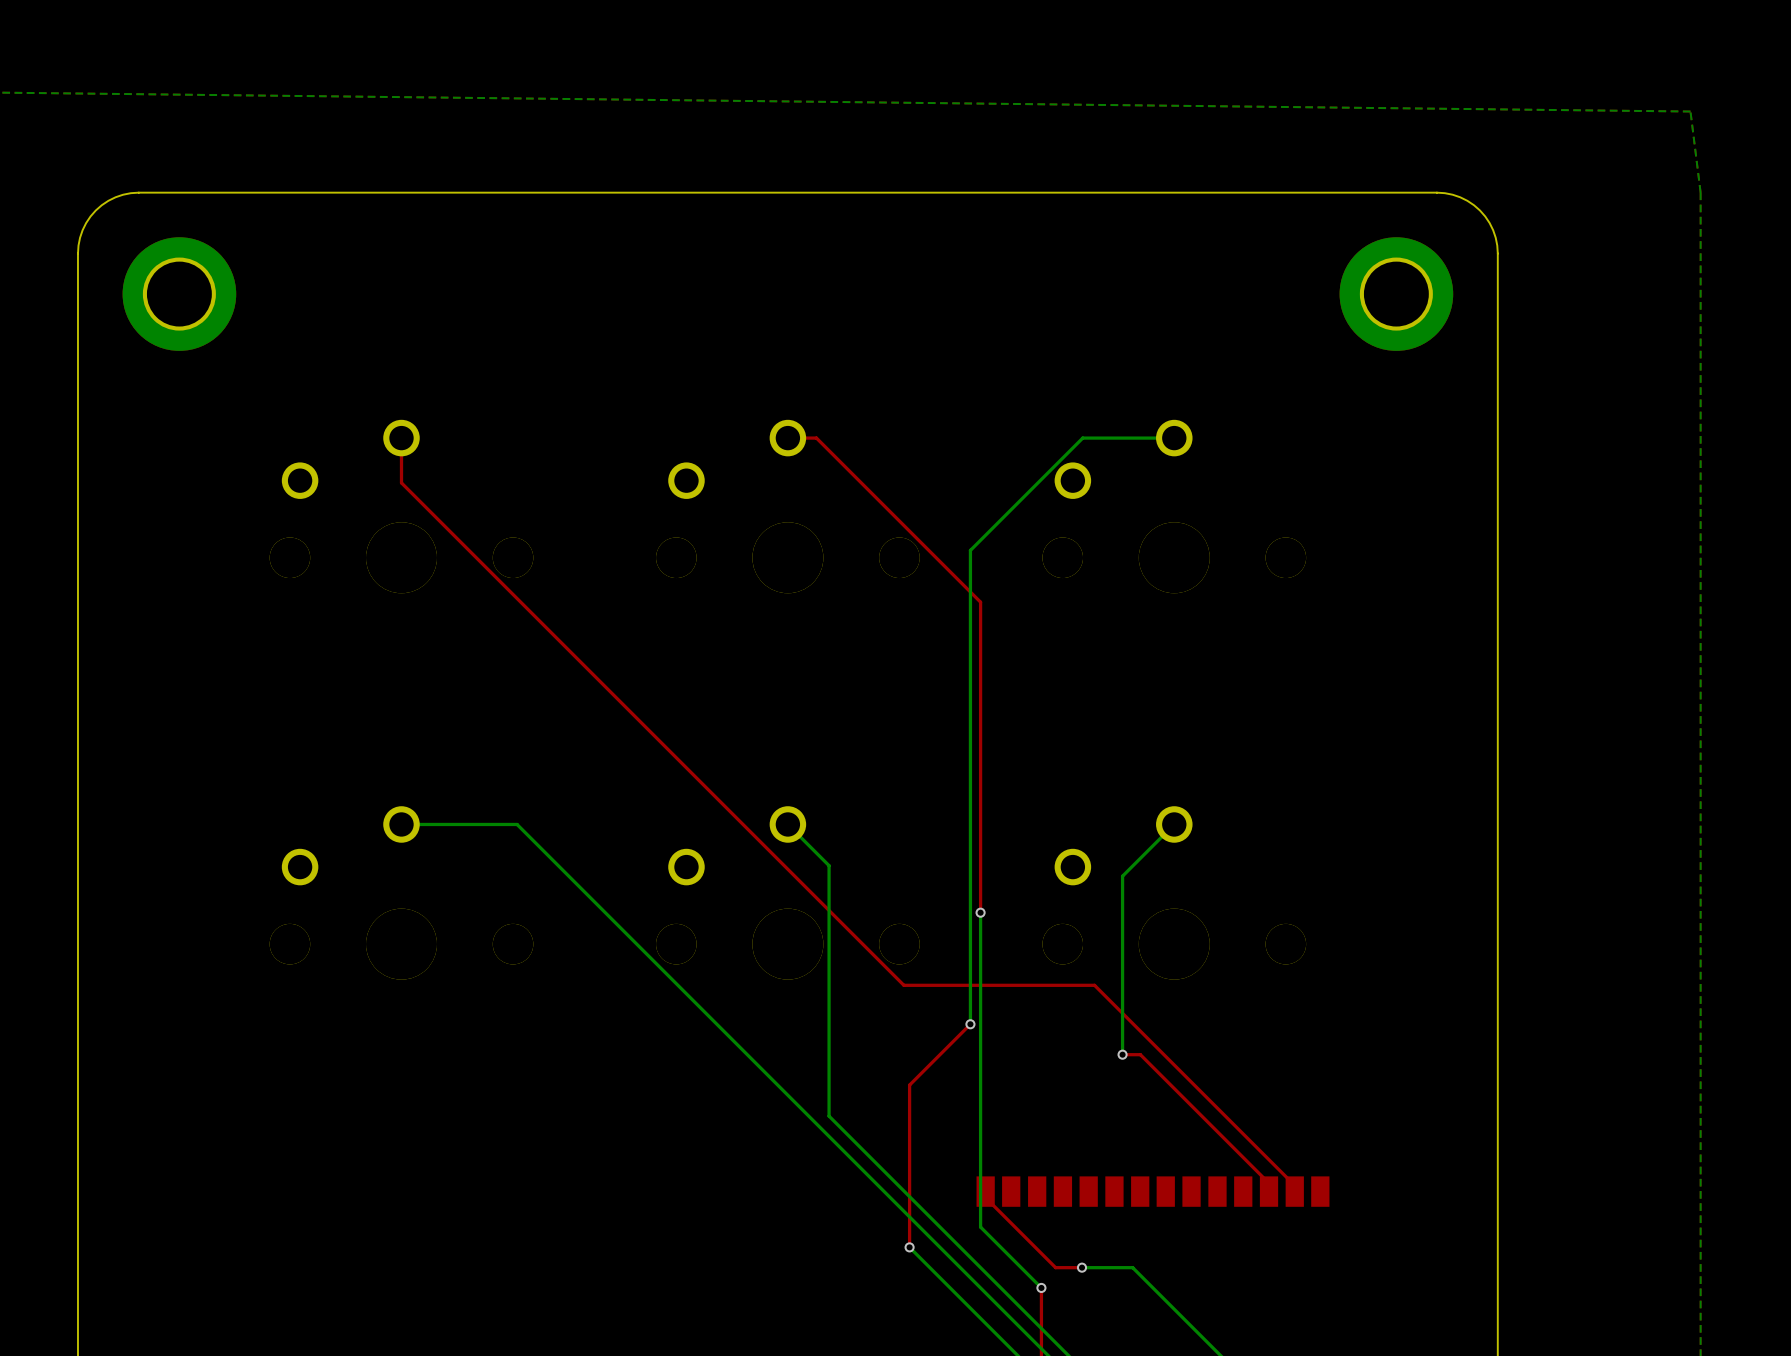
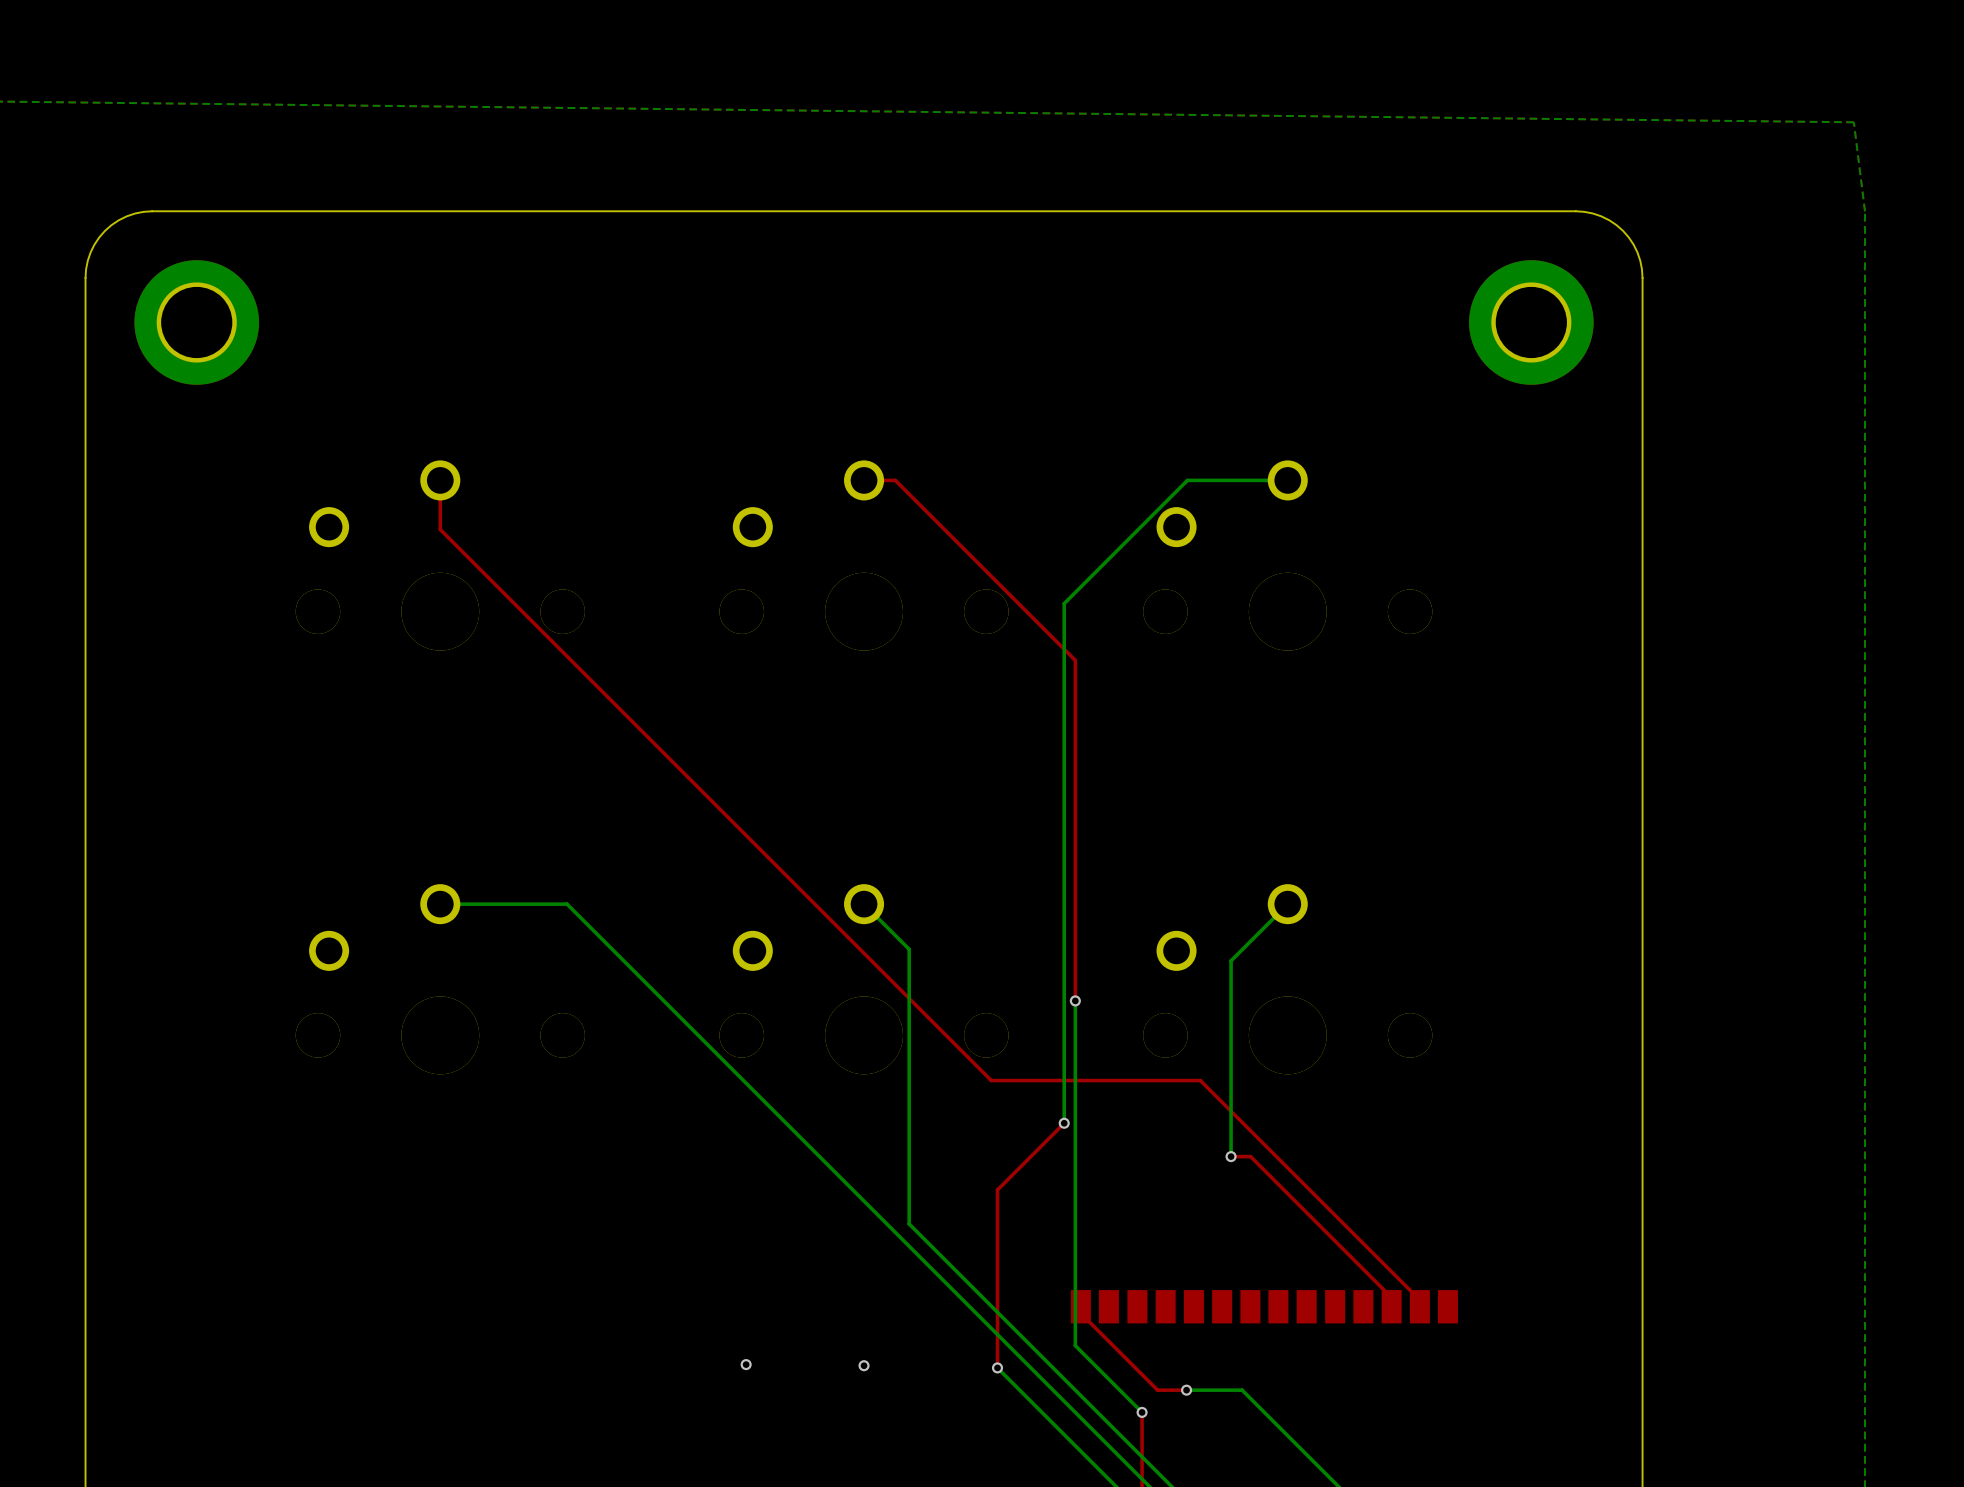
via: none -> (746, 1364)
via: none -> (864, 1365)

